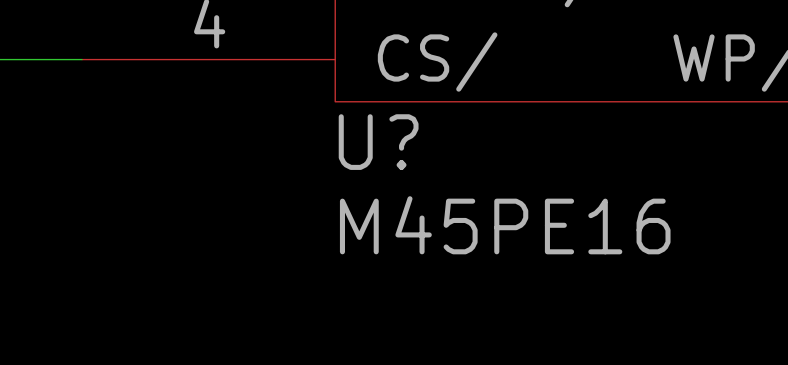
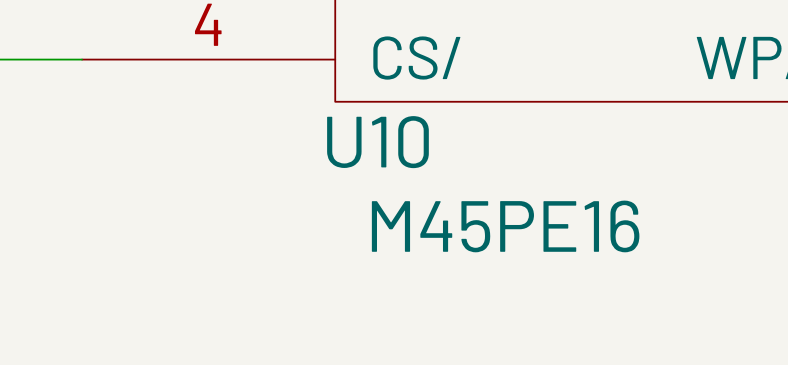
U? name: U? (378, 142) -> U10 (377, 142)

